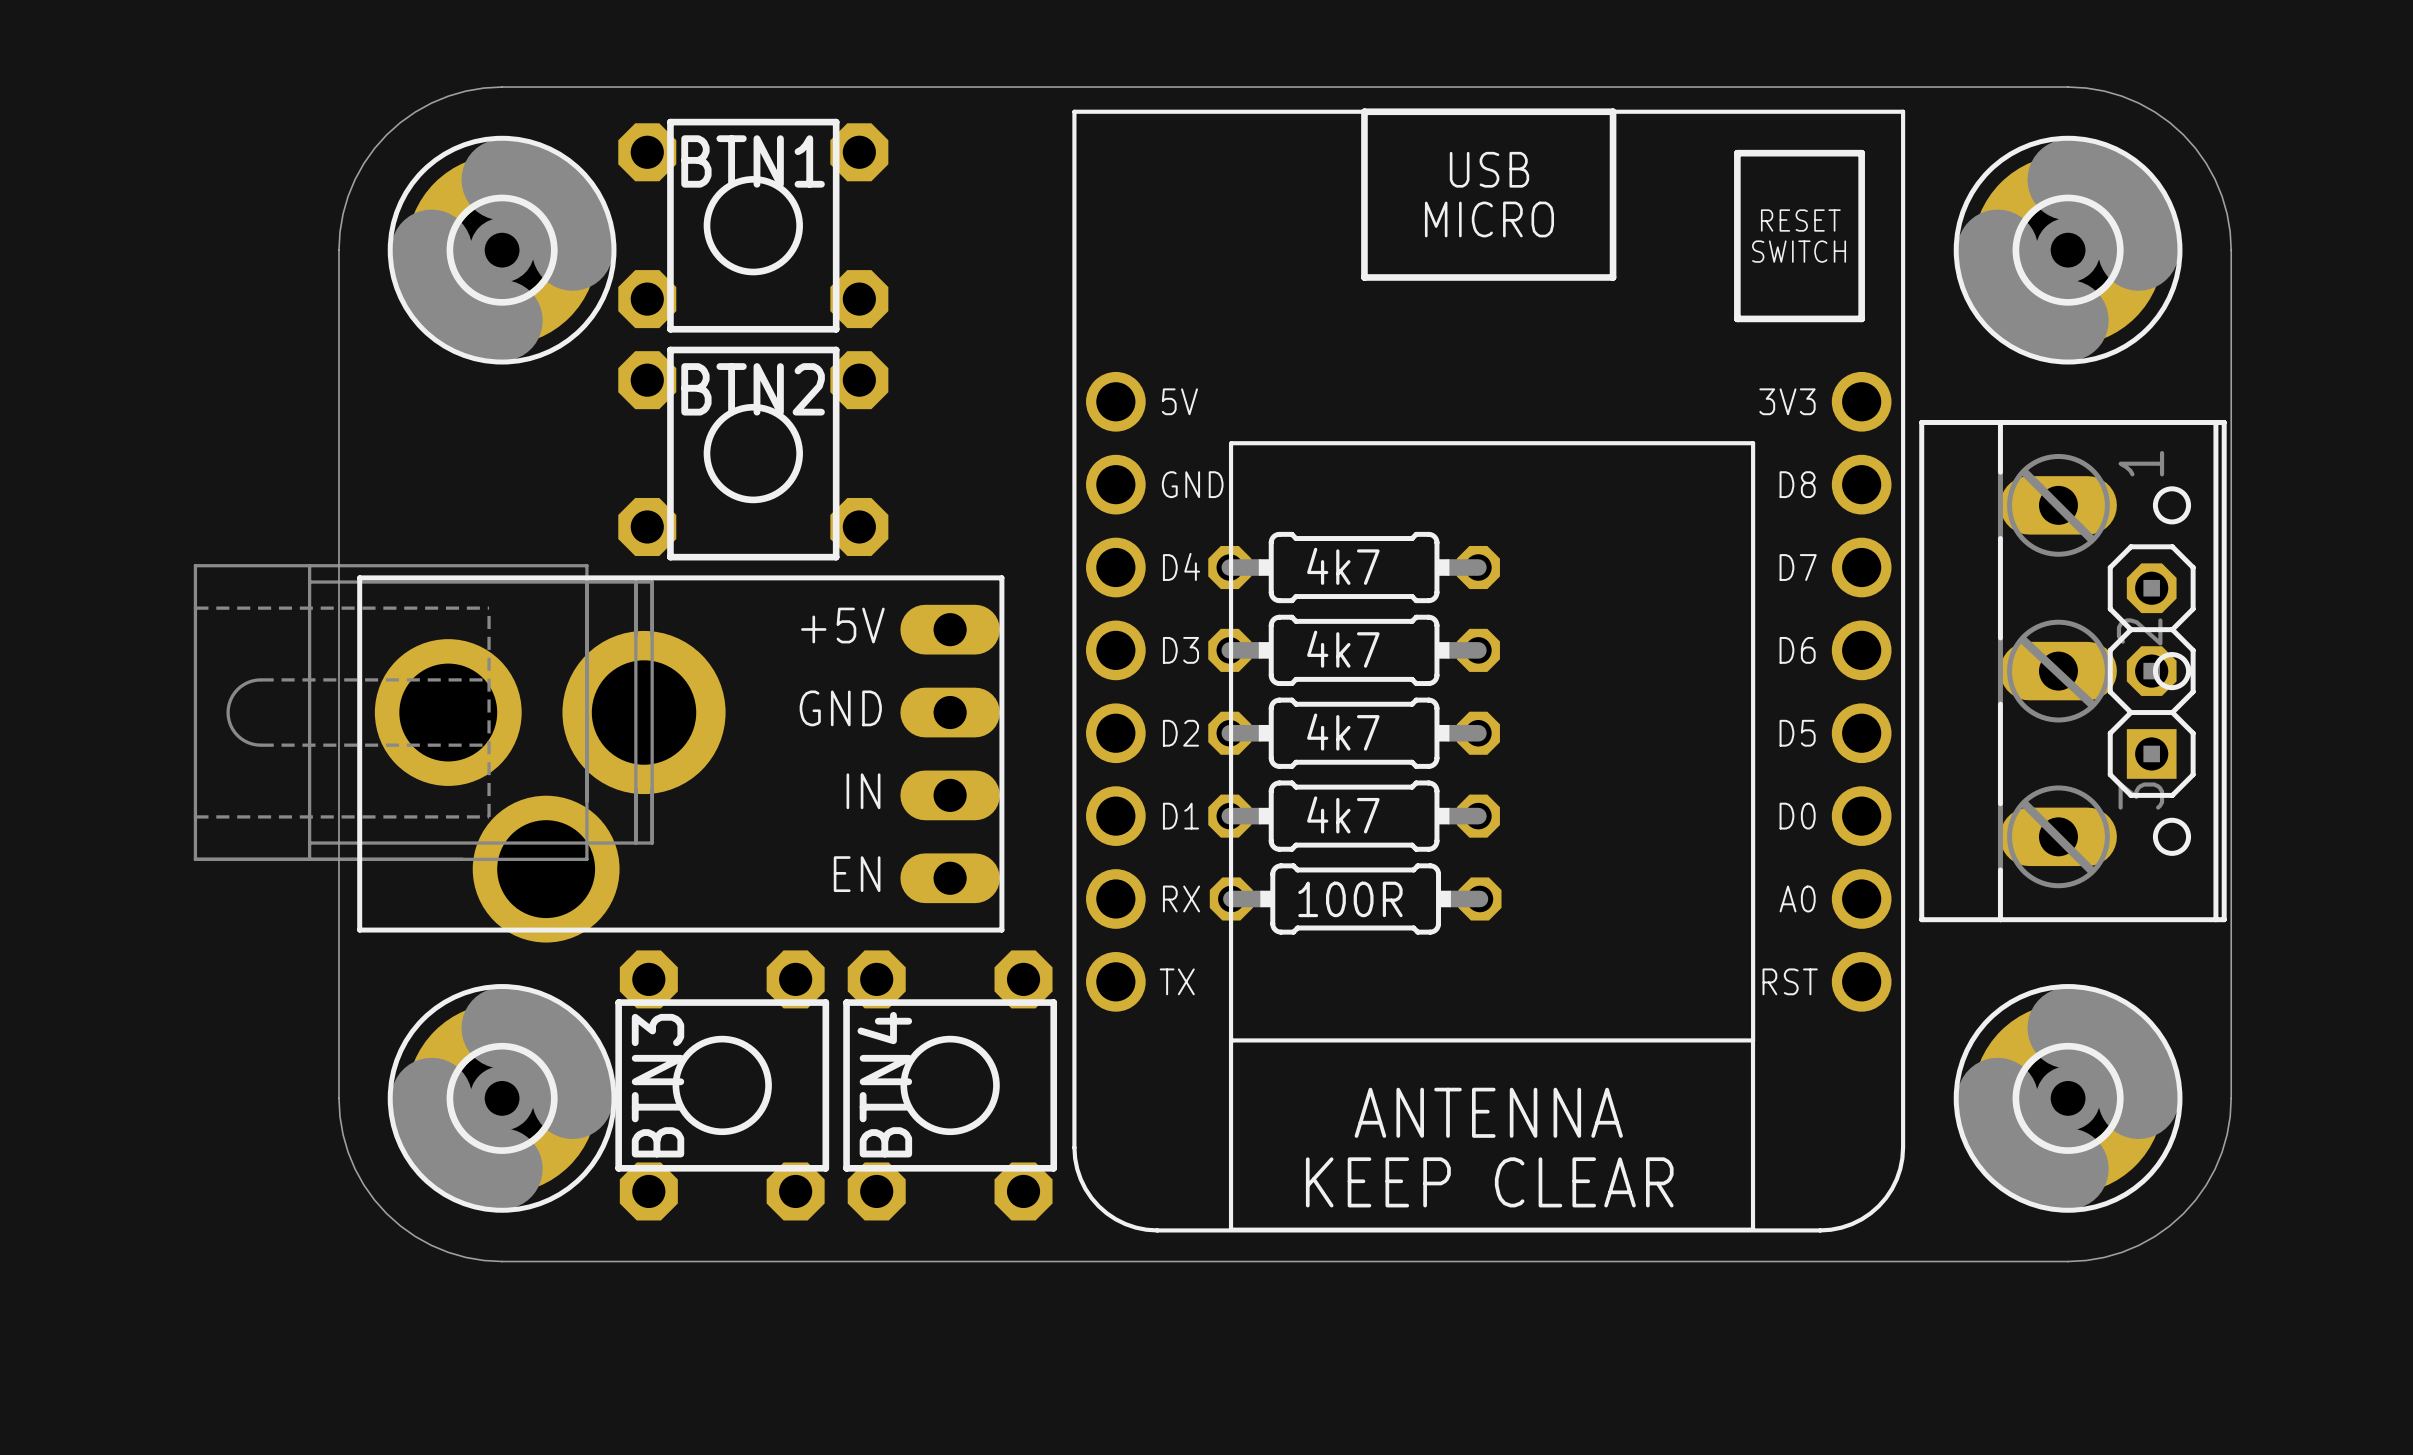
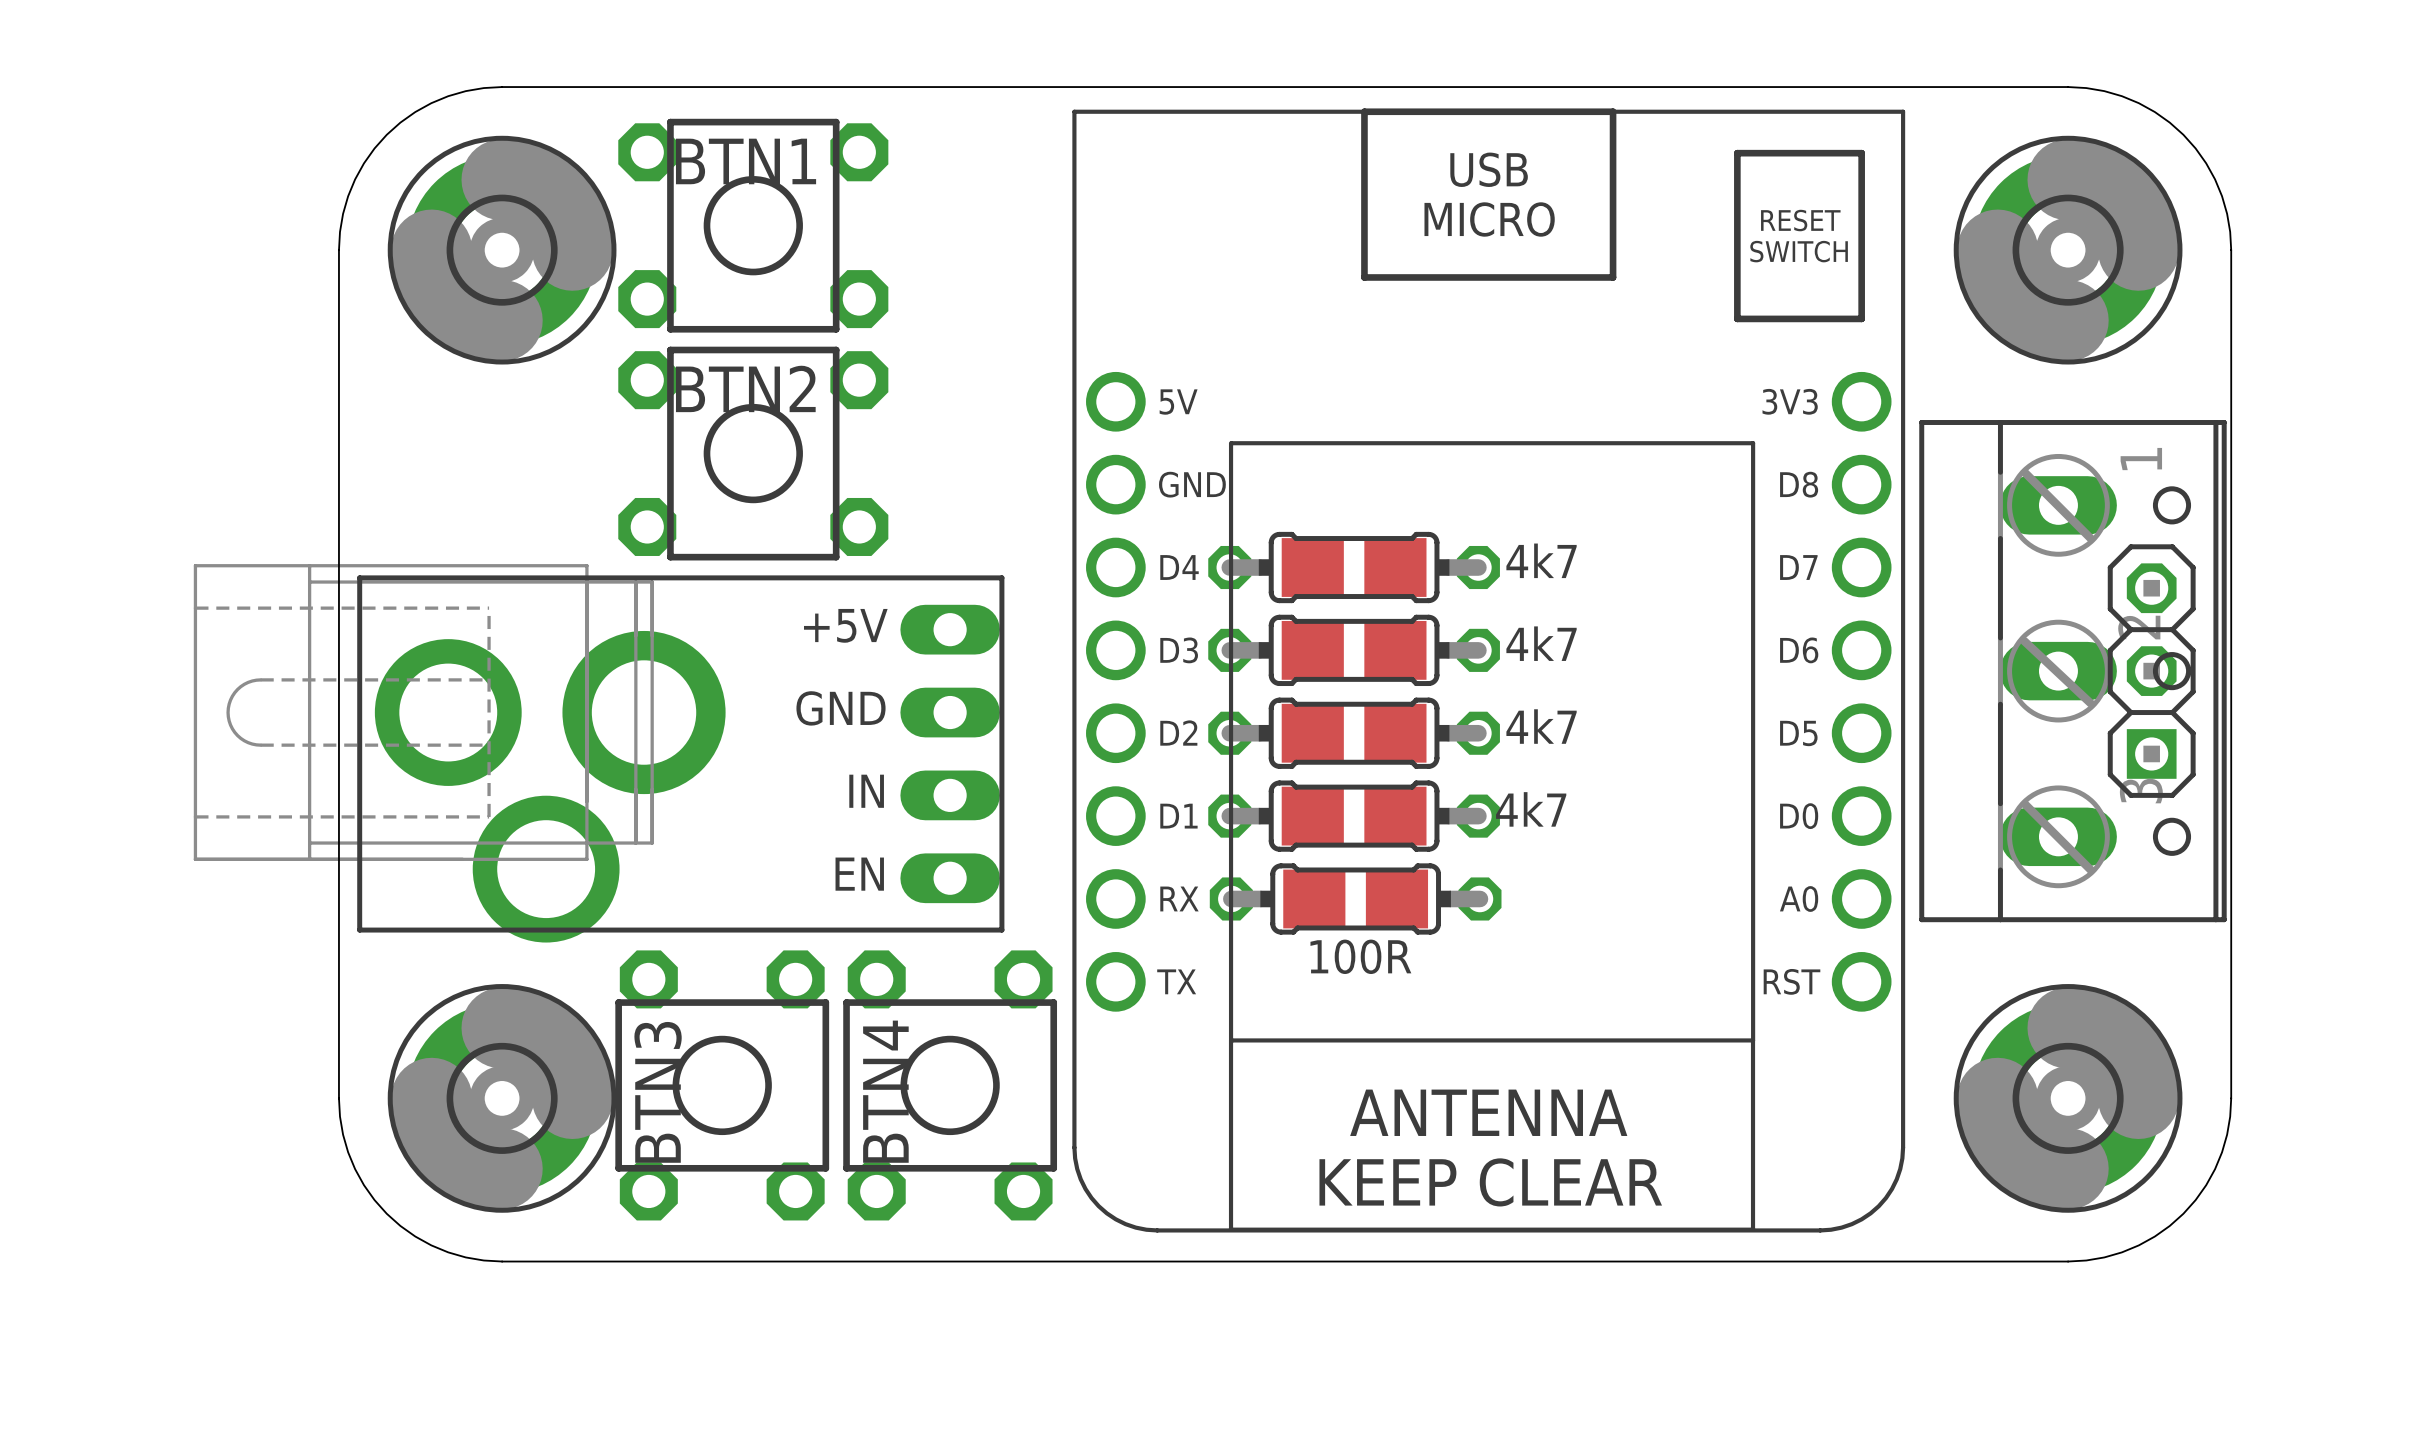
part footprint: [1208, 531, 1500, 604] -> [1208, 531, 1500, 604]
part value position: 4k7 (1343, 566) -> 4k7 (1541, 560)
part footprint: [1208, 614, 1500, 687] -> [1208, 614, 1500, 687]
part value position: 4k7 (1343, 649) -> 4k7 (1541, 643)
part footprint: [1208, 697, 1500, 769] -> [1208, 697, 1500, 769]
part value position: 4k7 (1343, 732) -> 4k7 (1541, 726)
part footprint: [1208, 780, 1500, 852] -> [1208, 780, 1500, 852]
part value position: 4k7 (1343, 814) -> 4k7 (1531, 809)
part footprint: [1209, 863, 1502, 935] -> [1209, 863, 1502, 935]

